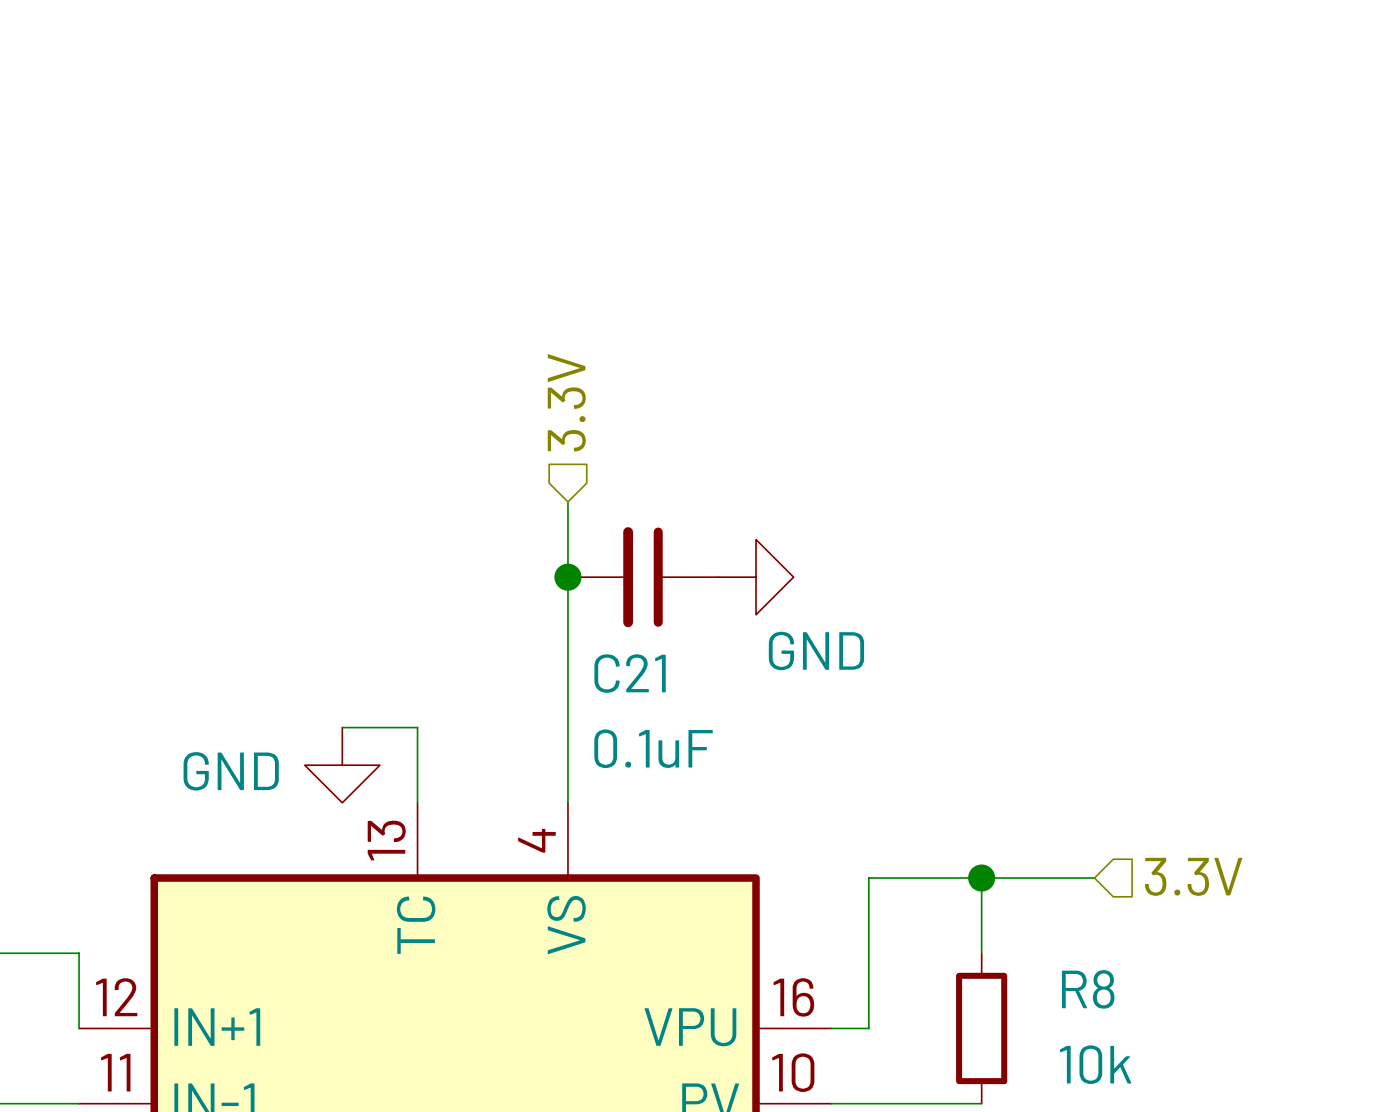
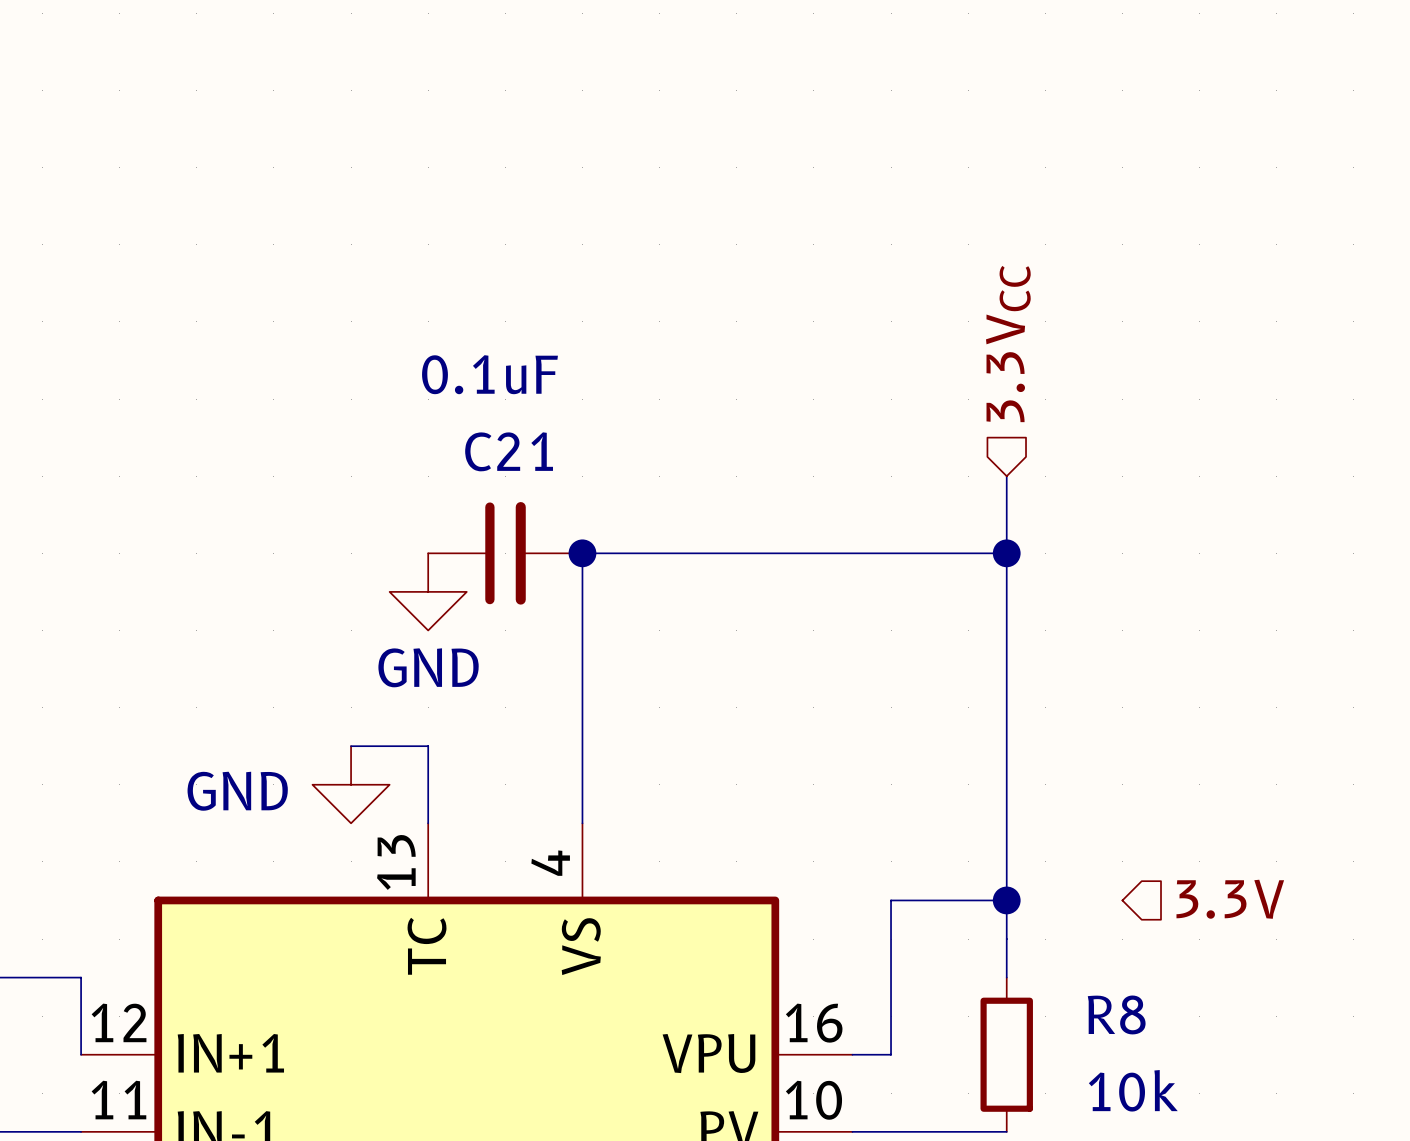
hierarchical label: none -> 3.3VCC (1008, 344)
hierarchical label: 3.3V (566, 402) -> none
wire: (567, 501) (567, 539) -> (1006, 553) (582, 553)
junction: none -> (1006, 553)
junction position: (567, 577) -> (582, 553)
C21 rotation: 0° (642, 577) -> 180° (505, 553)
C21 position: (643, 577) -> (505, 553)
power symbol rotation: 0° (756, 577) -> 90° clockwise (428, 591)
power symbol position: GND (756, 577) -> GND (428, 591)
power symbol text position: GND (816, 650) -> GND (428, 667)
wire: (981, 878) (1094, 878) -> (1006, 900) (1006, 476)

